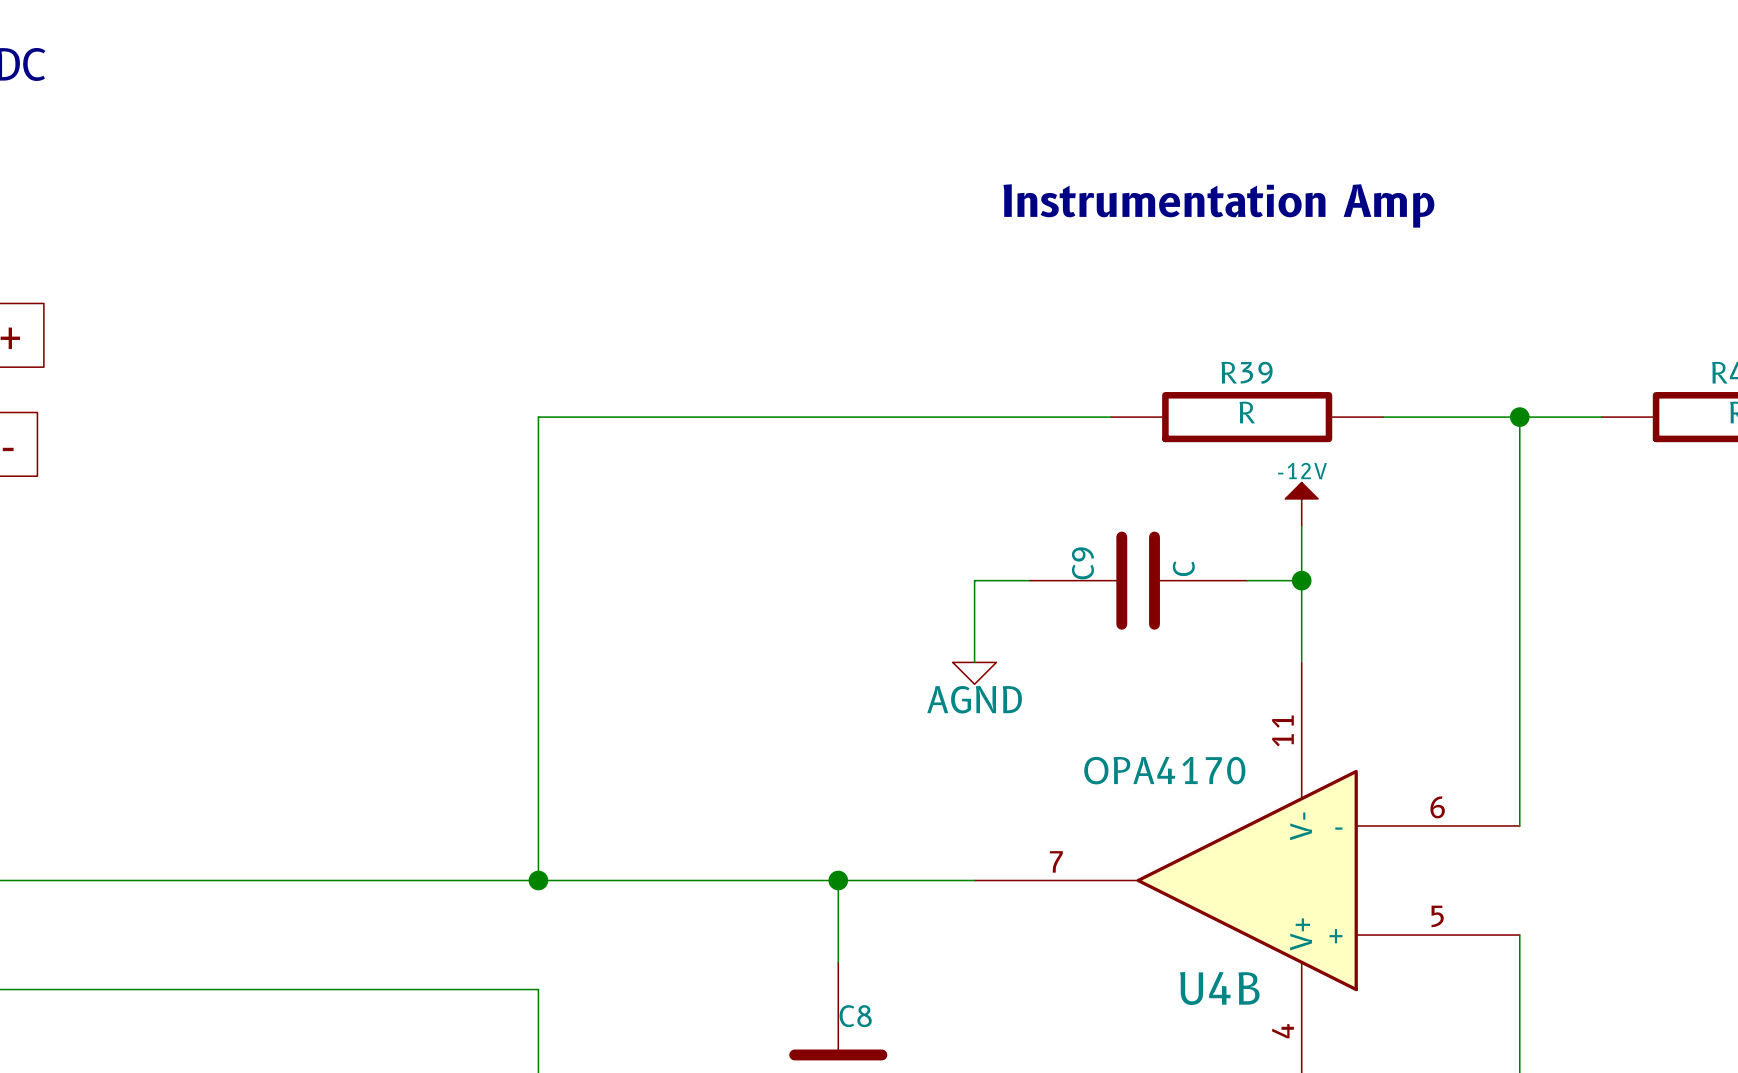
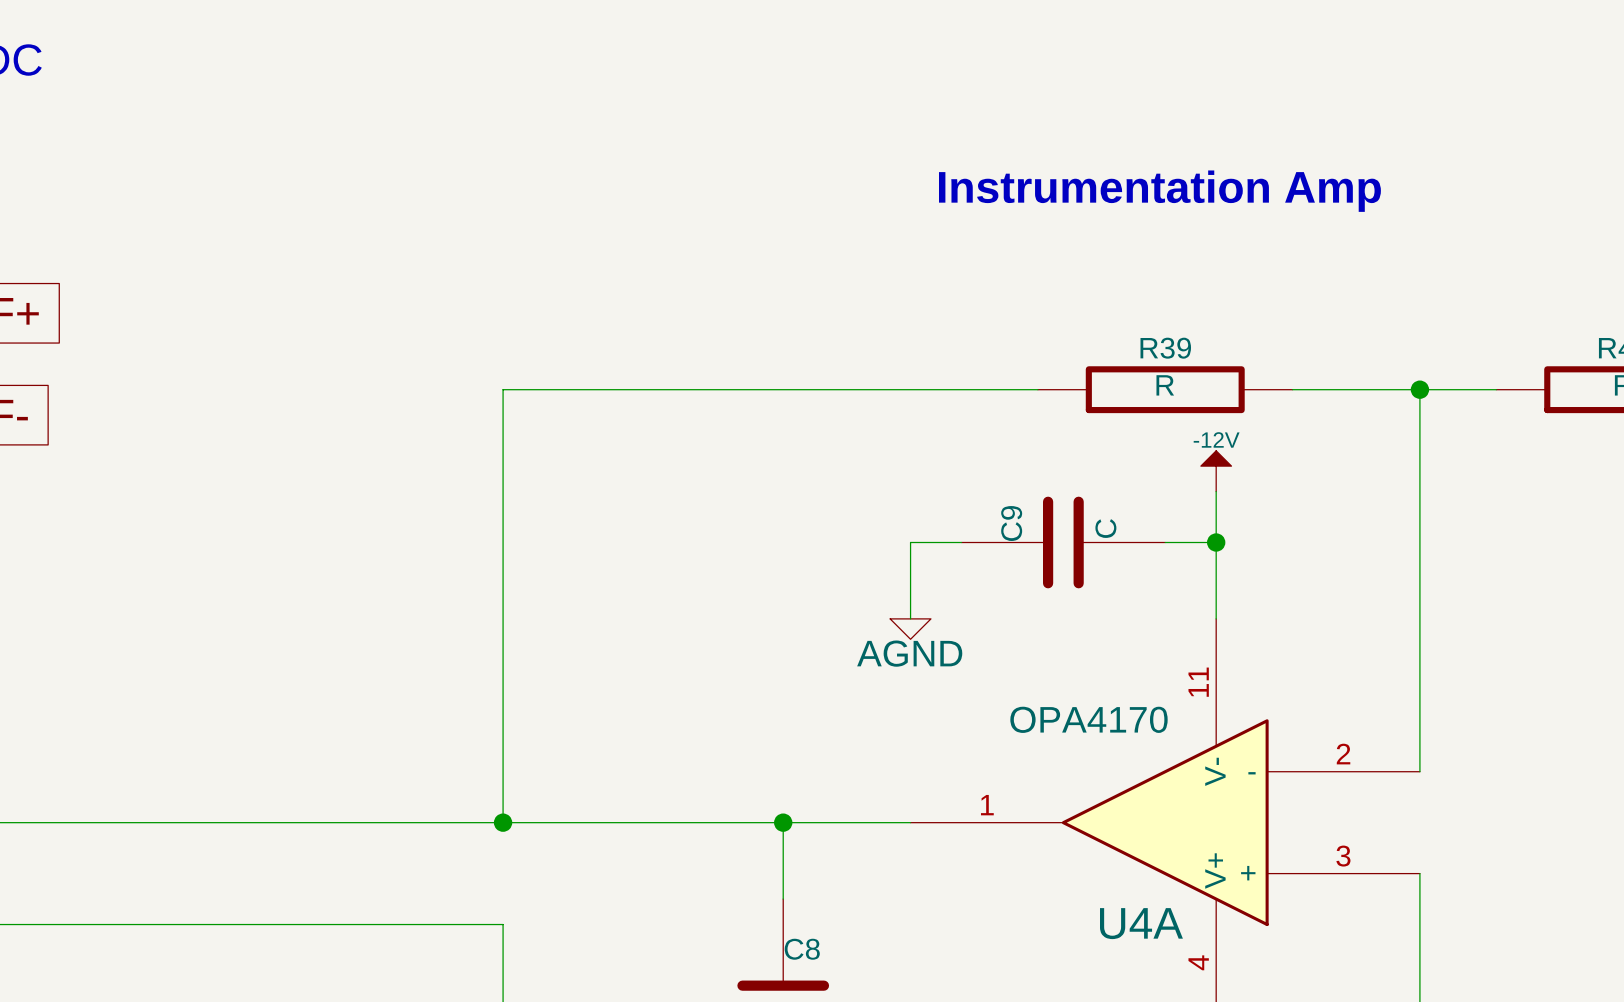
U4B pin number: 6 (1437, 807) -> 2 (1343, 754)
U4B pin number: 7 (1056, 861) -> 1 (987, 805)
U4B pin number: 5 (1437, 916) -> 3 (1343, 856)
U4B name: U4B (1219, 988) -> U4A (1141, 923)

